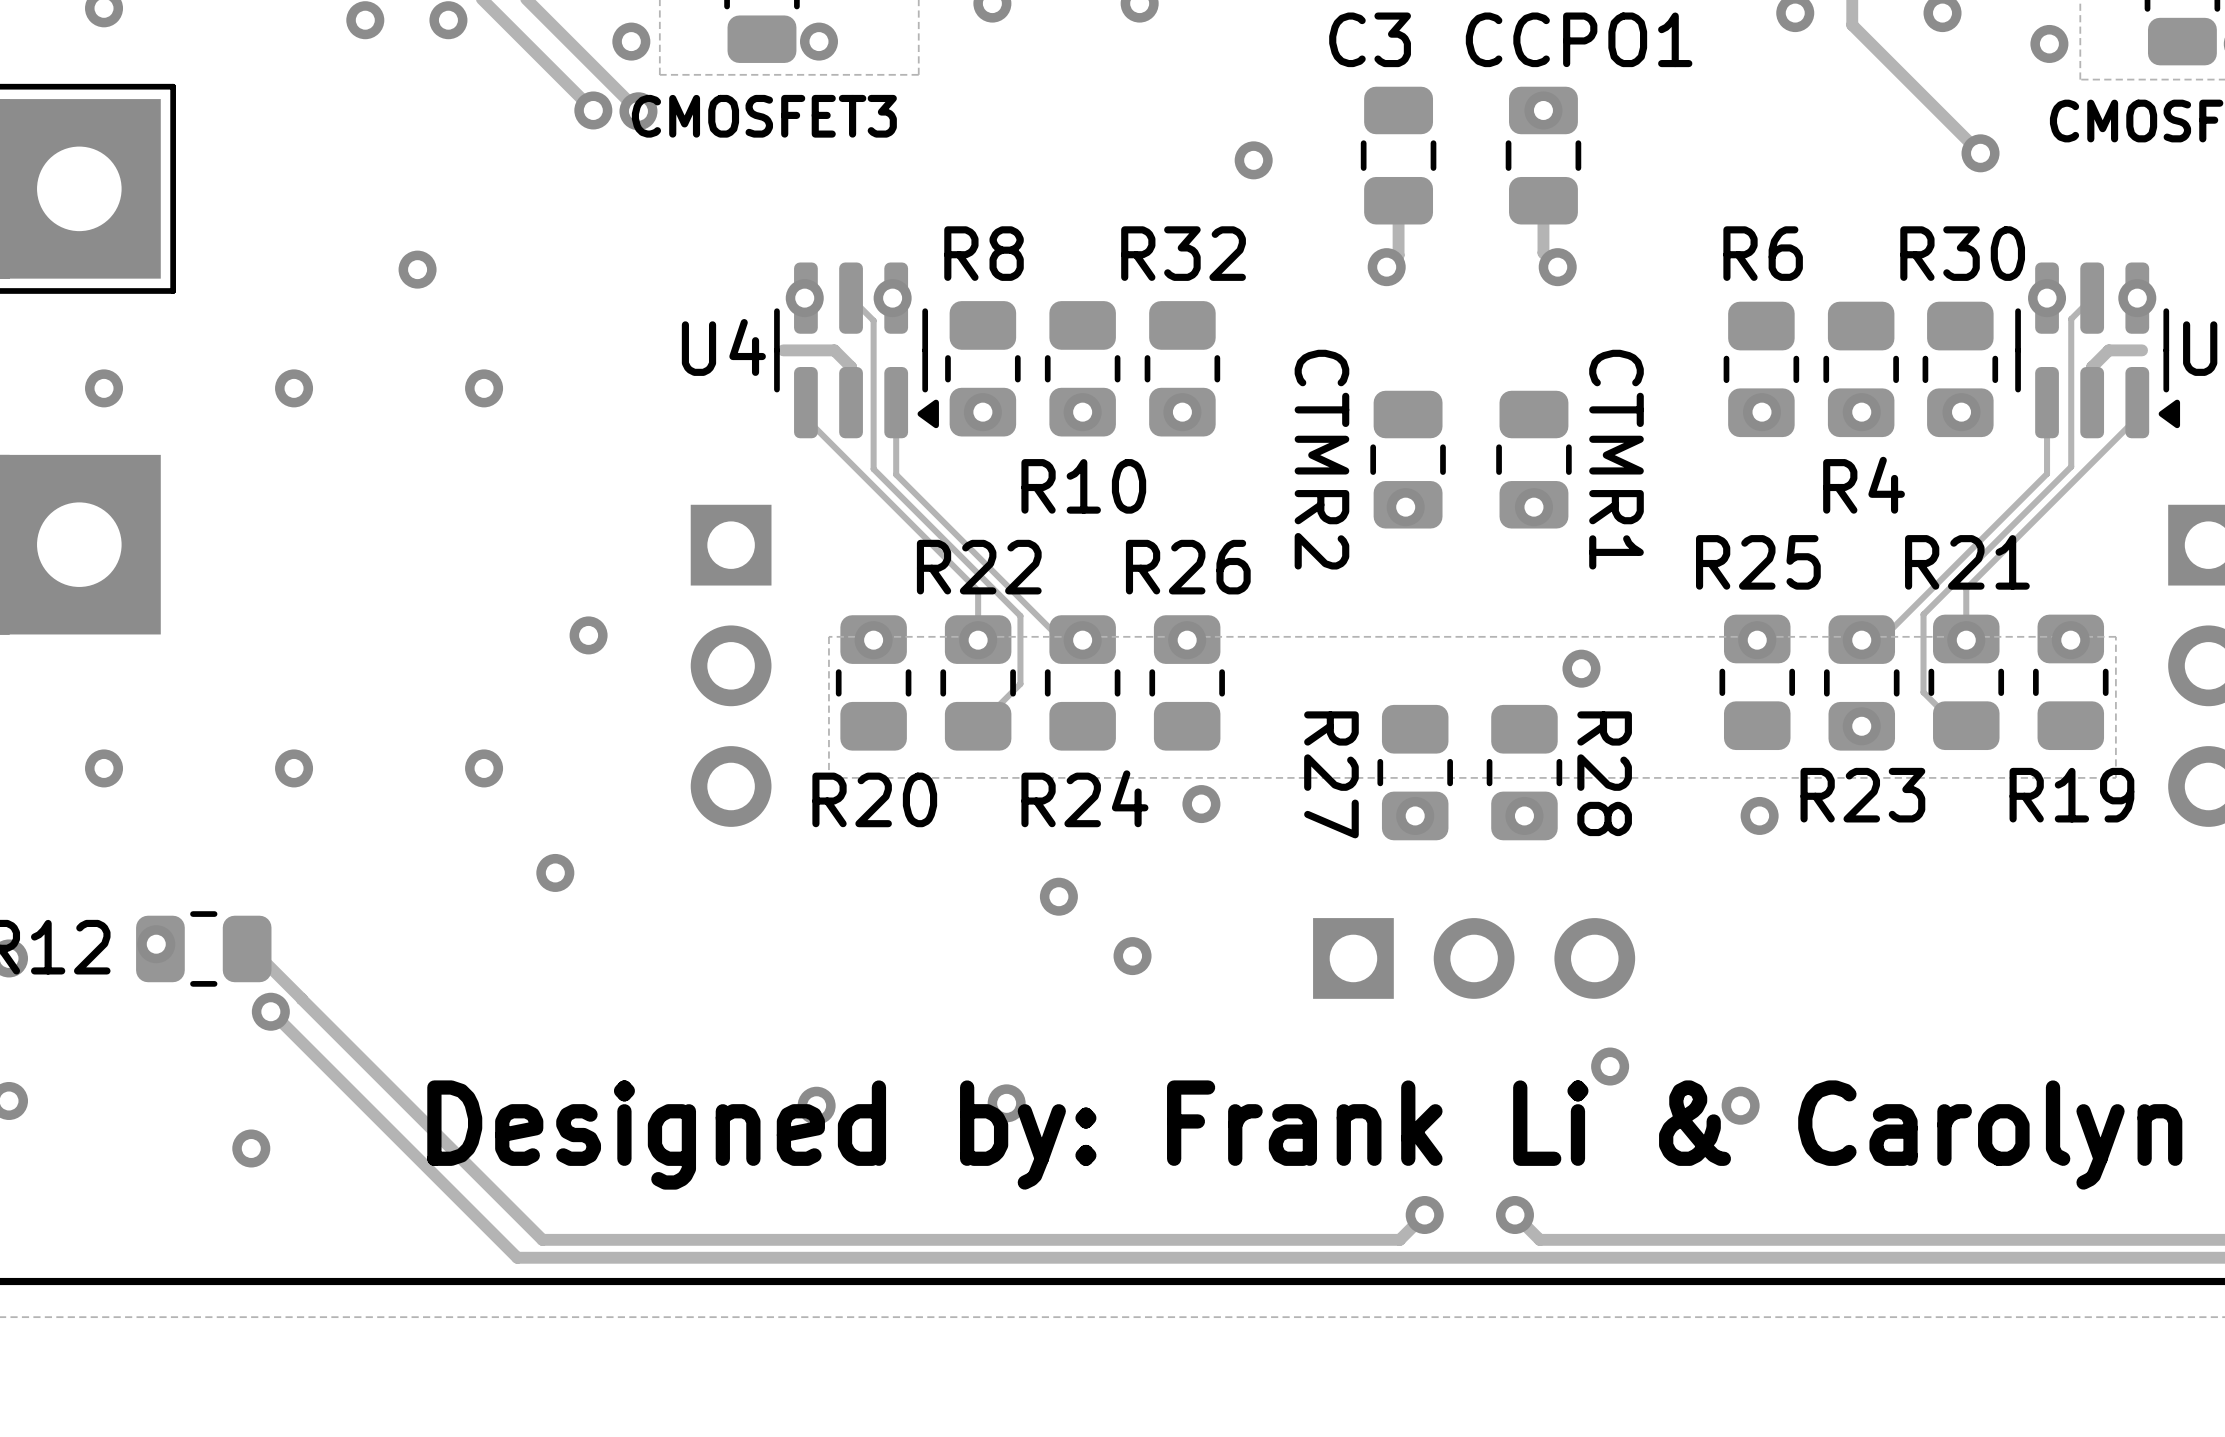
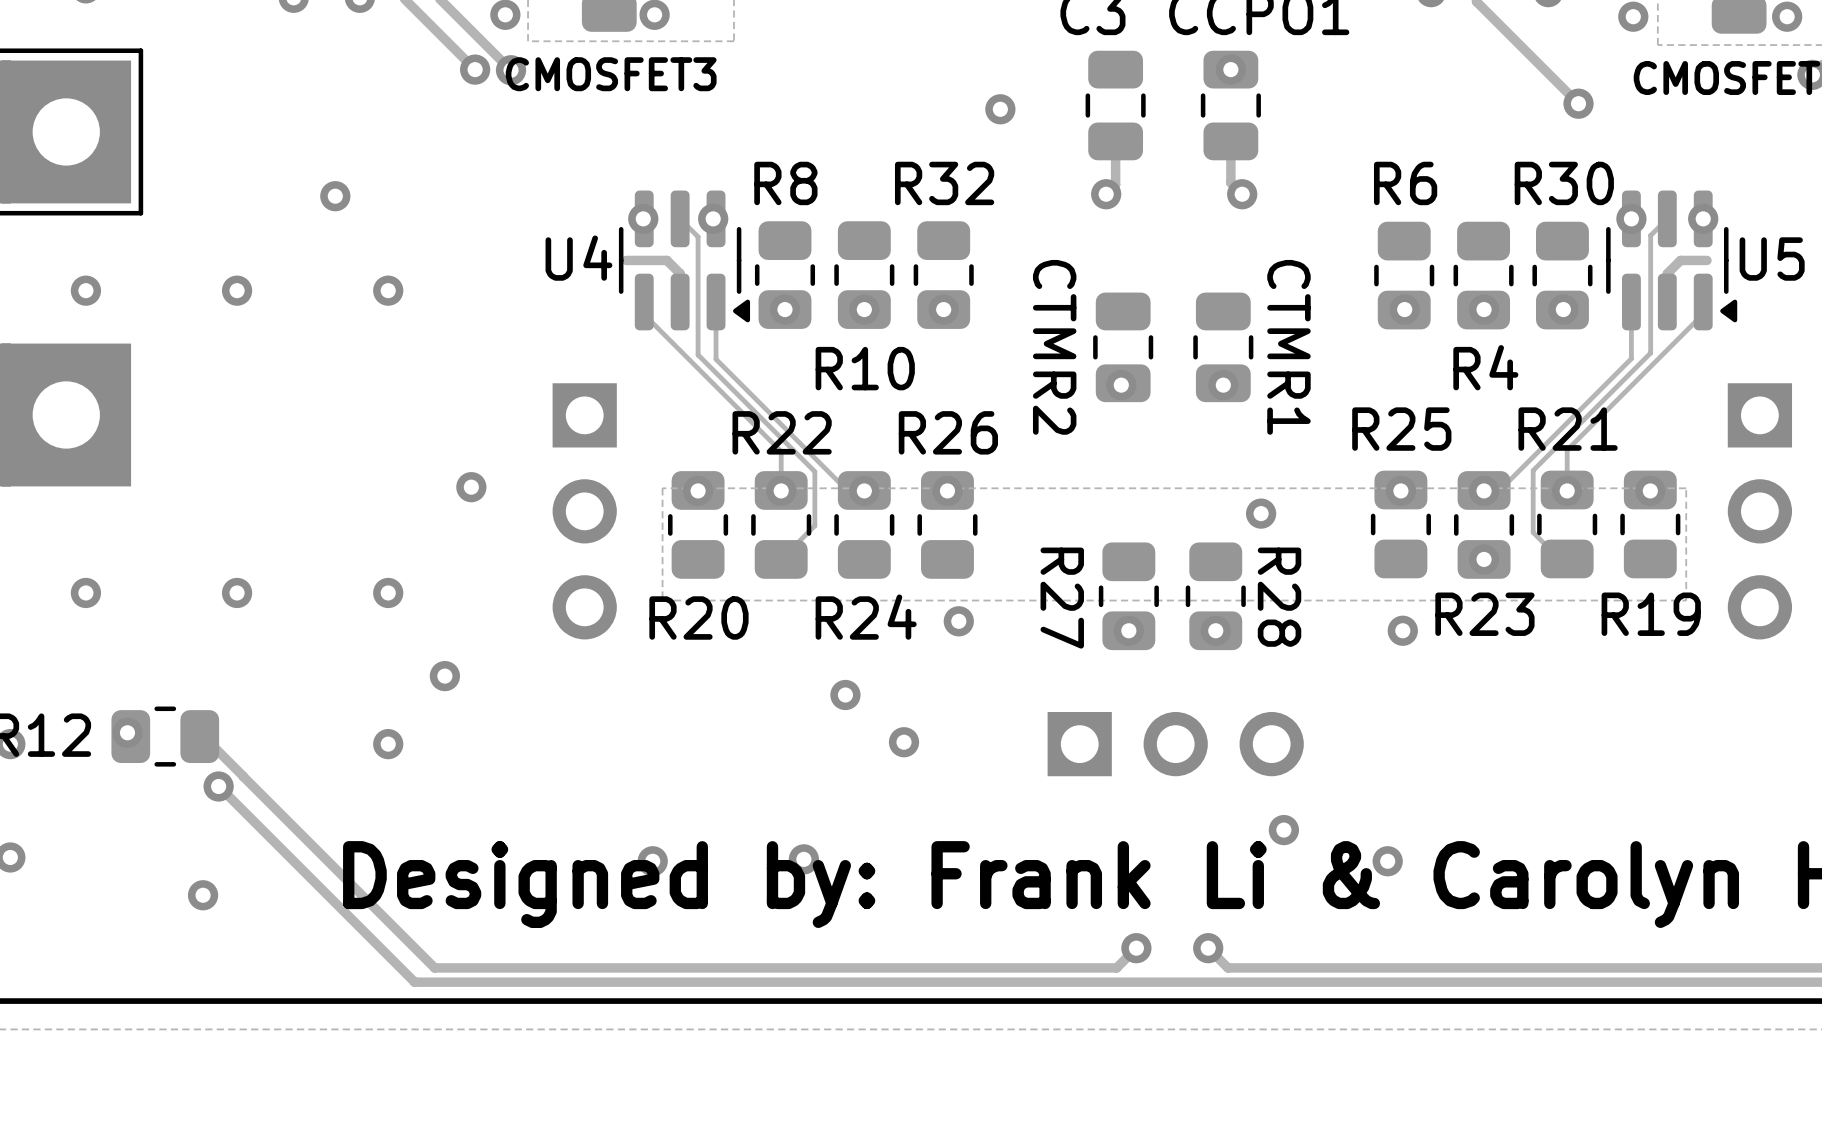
via: none -> (388, 744)

